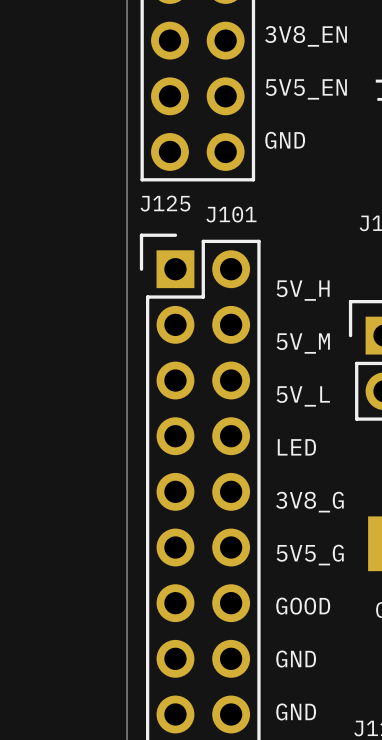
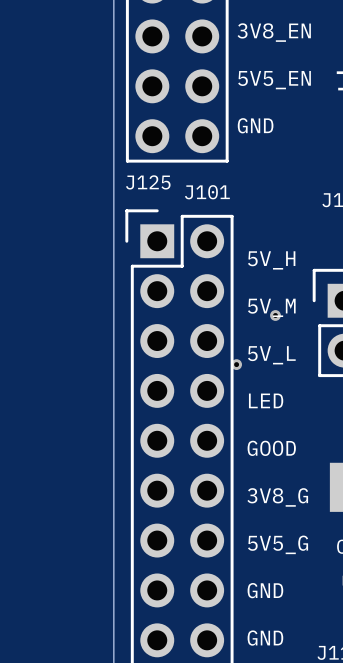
via: none -> (275, 315)
via: none -> (236, 364)
text: 3V8_G (309, 502) -> GOOD (271, 448)
text: 5V5_G (310, 555) -> 3V8_G (277, 497)
text: GOOD (303, 606) -> 5V5_G (278, 544)

